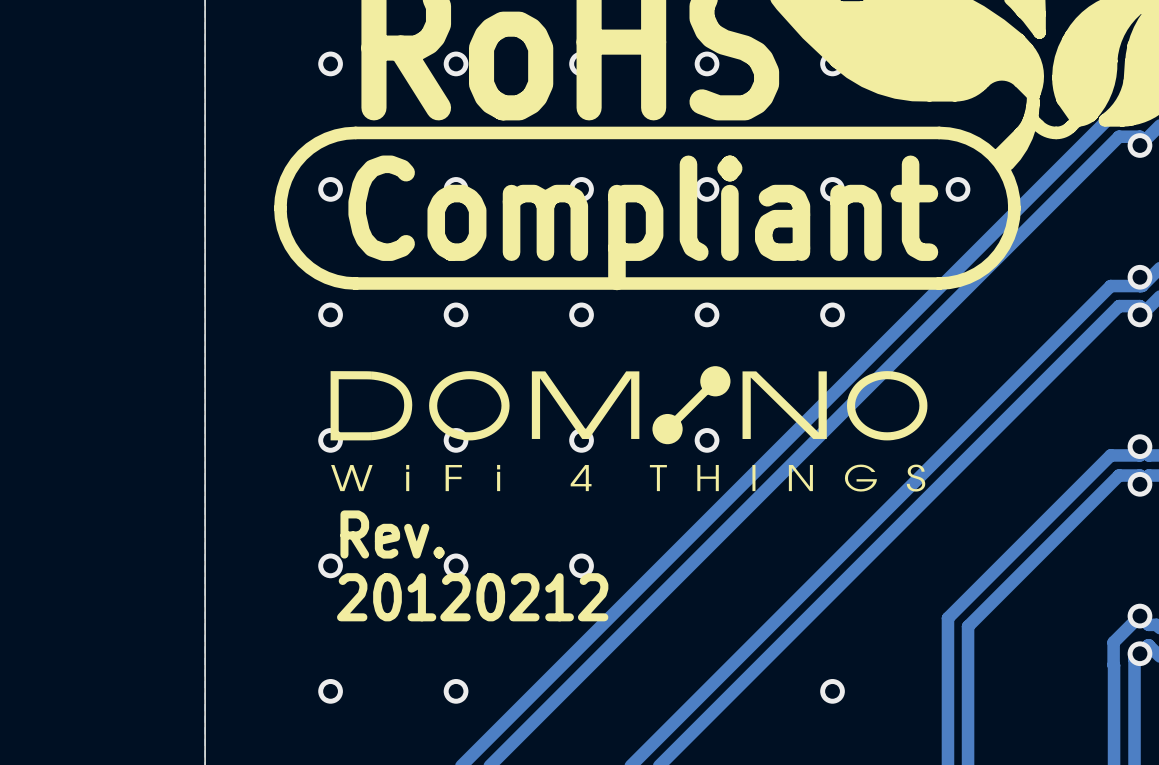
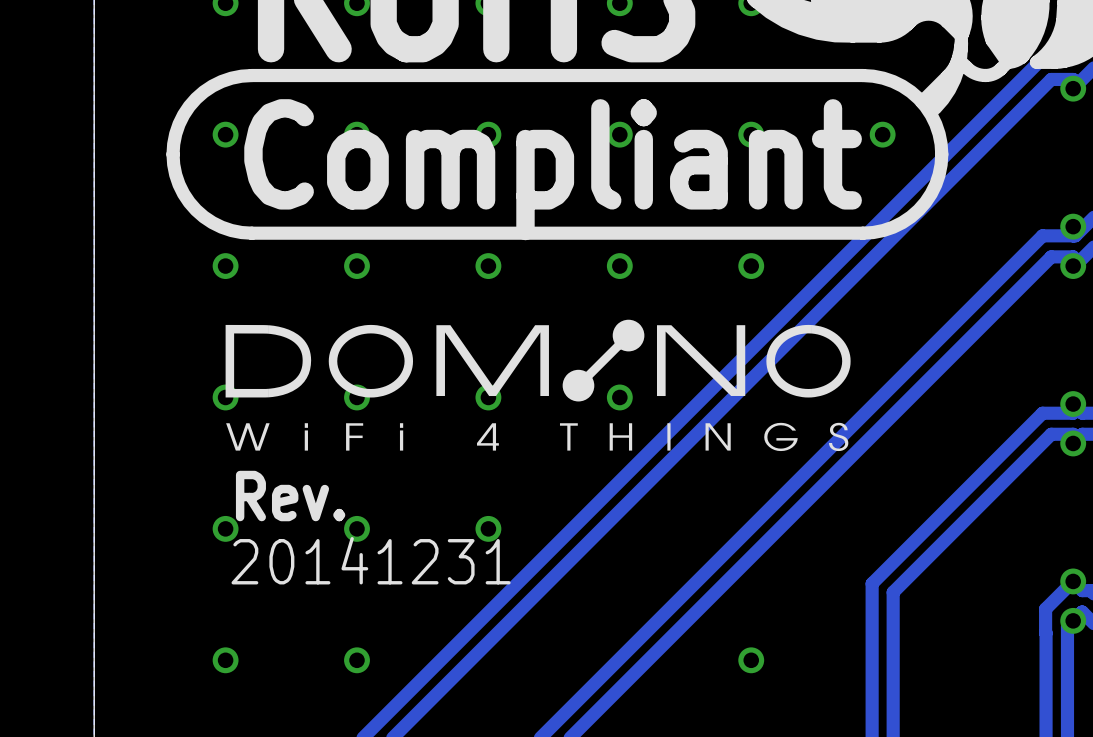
text: 20120212 (472, 597) -> 20141231 (371, 560)

